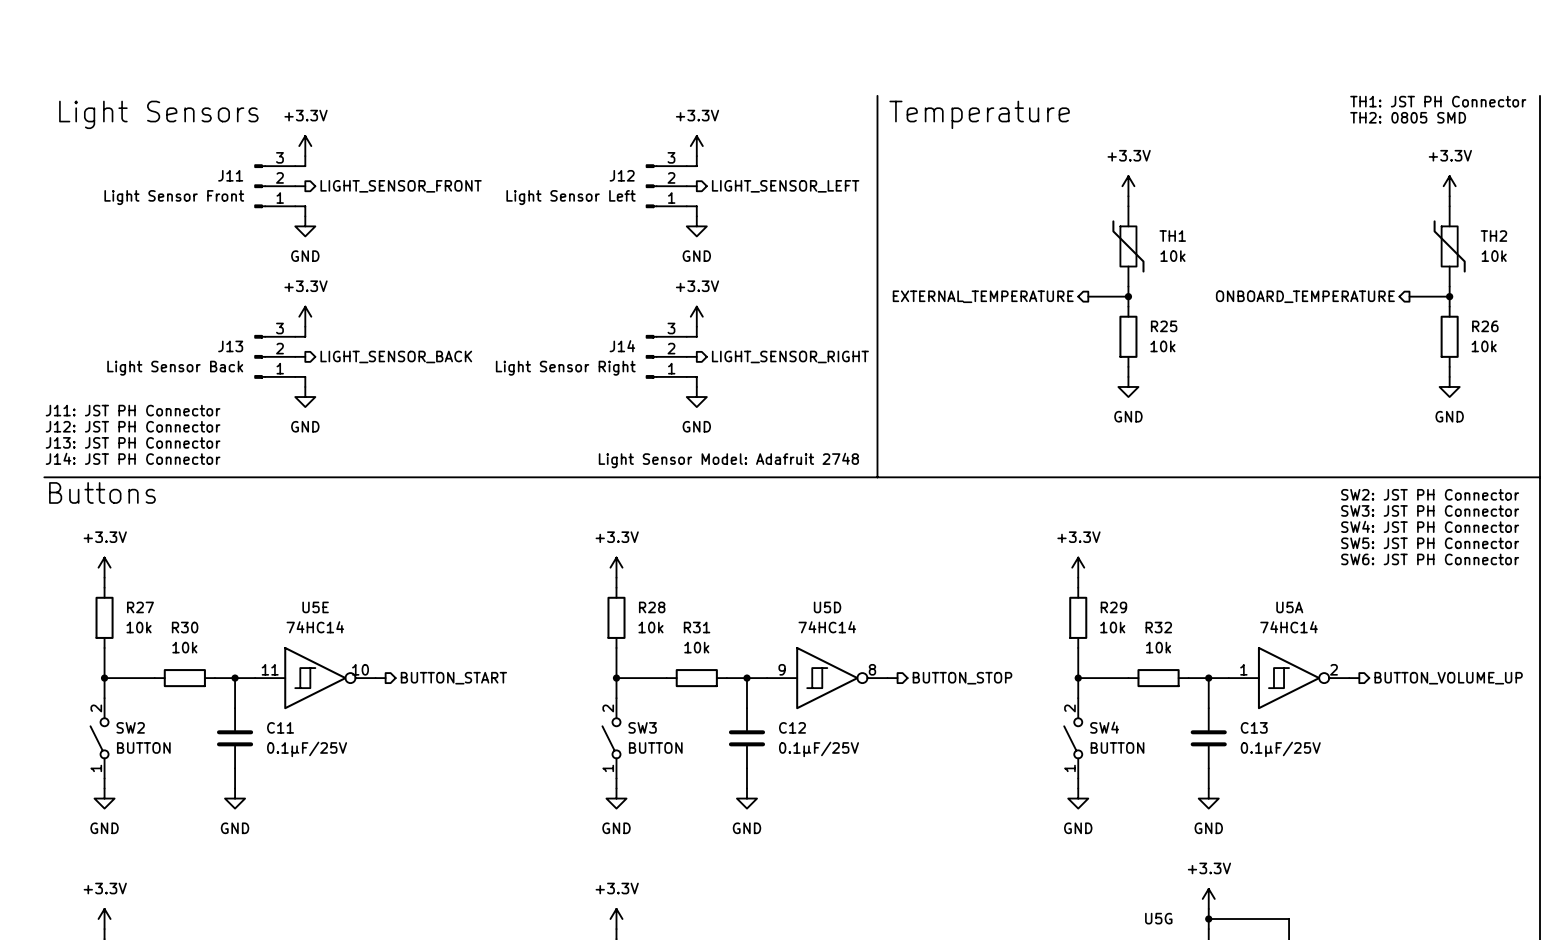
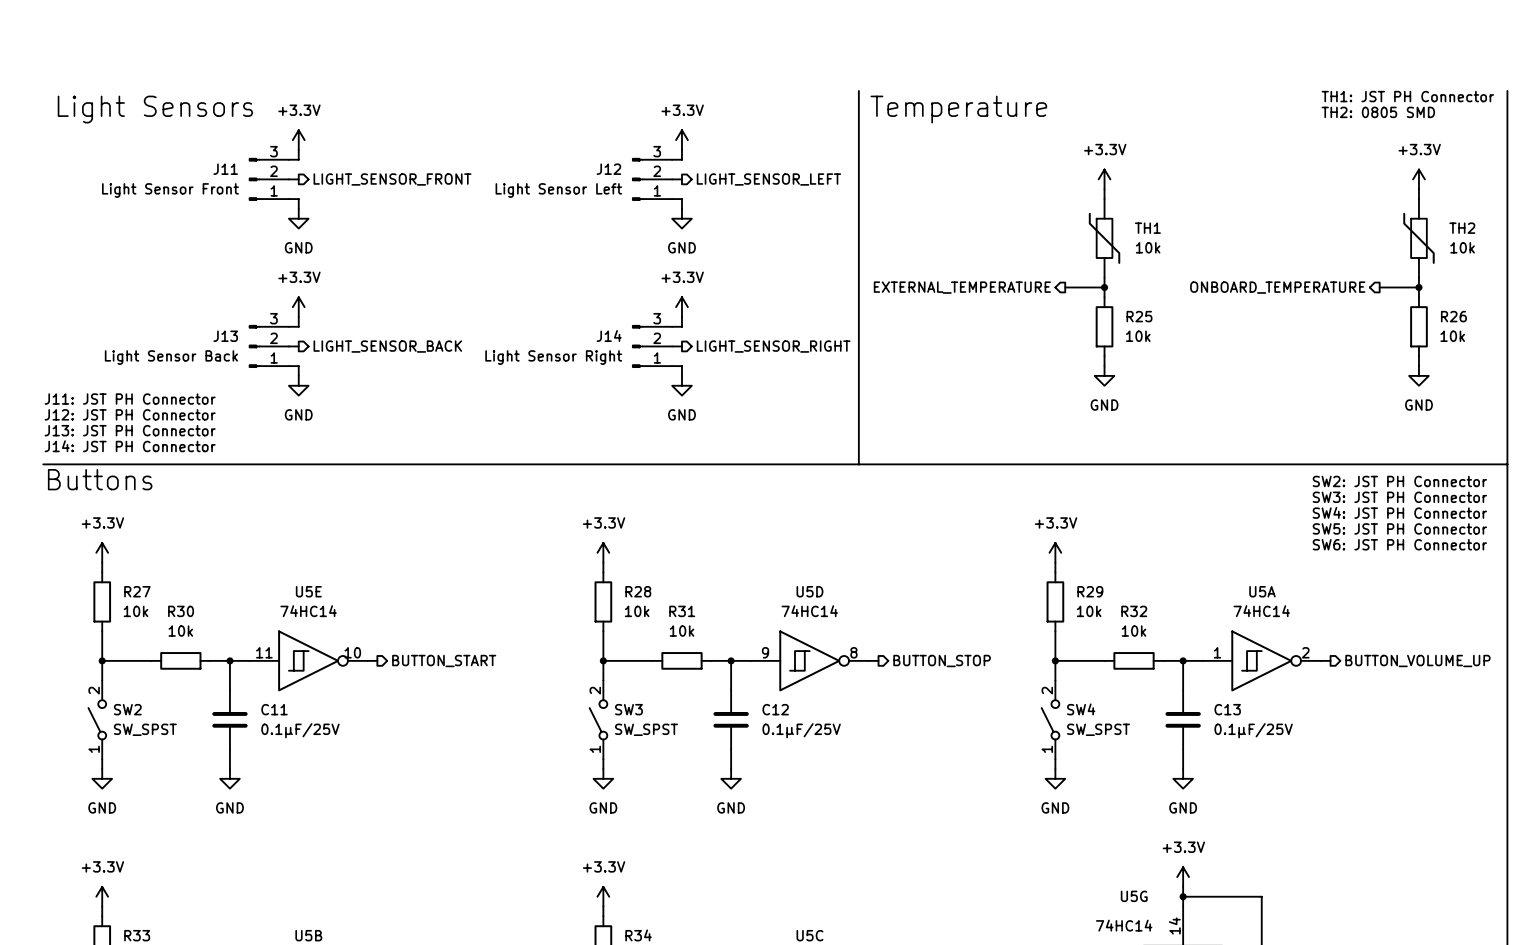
text: Light Sensor Model: Adafruit 2748 (728, 460) -> none
SW2 value: BUTTON (143, 747) -> SW_SPST (145, 729)
SW3 value: BUTTON (655, 747) -> SW_SPST (646, 729)
SW4 value: BUTTON (1117, 747) -> SW_SPST (1098, 729)

